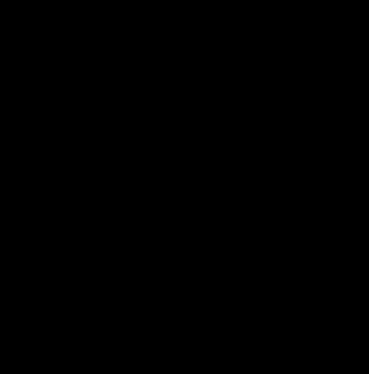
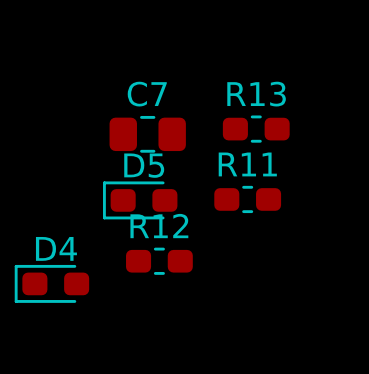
R13: none -> (256, 129)
C7: none -> (147, 134)
R11: none -> (247, 199)
D5: none -> (140, 200)
R12: none -> (159, 261)
D4: none -> (51, 283)

